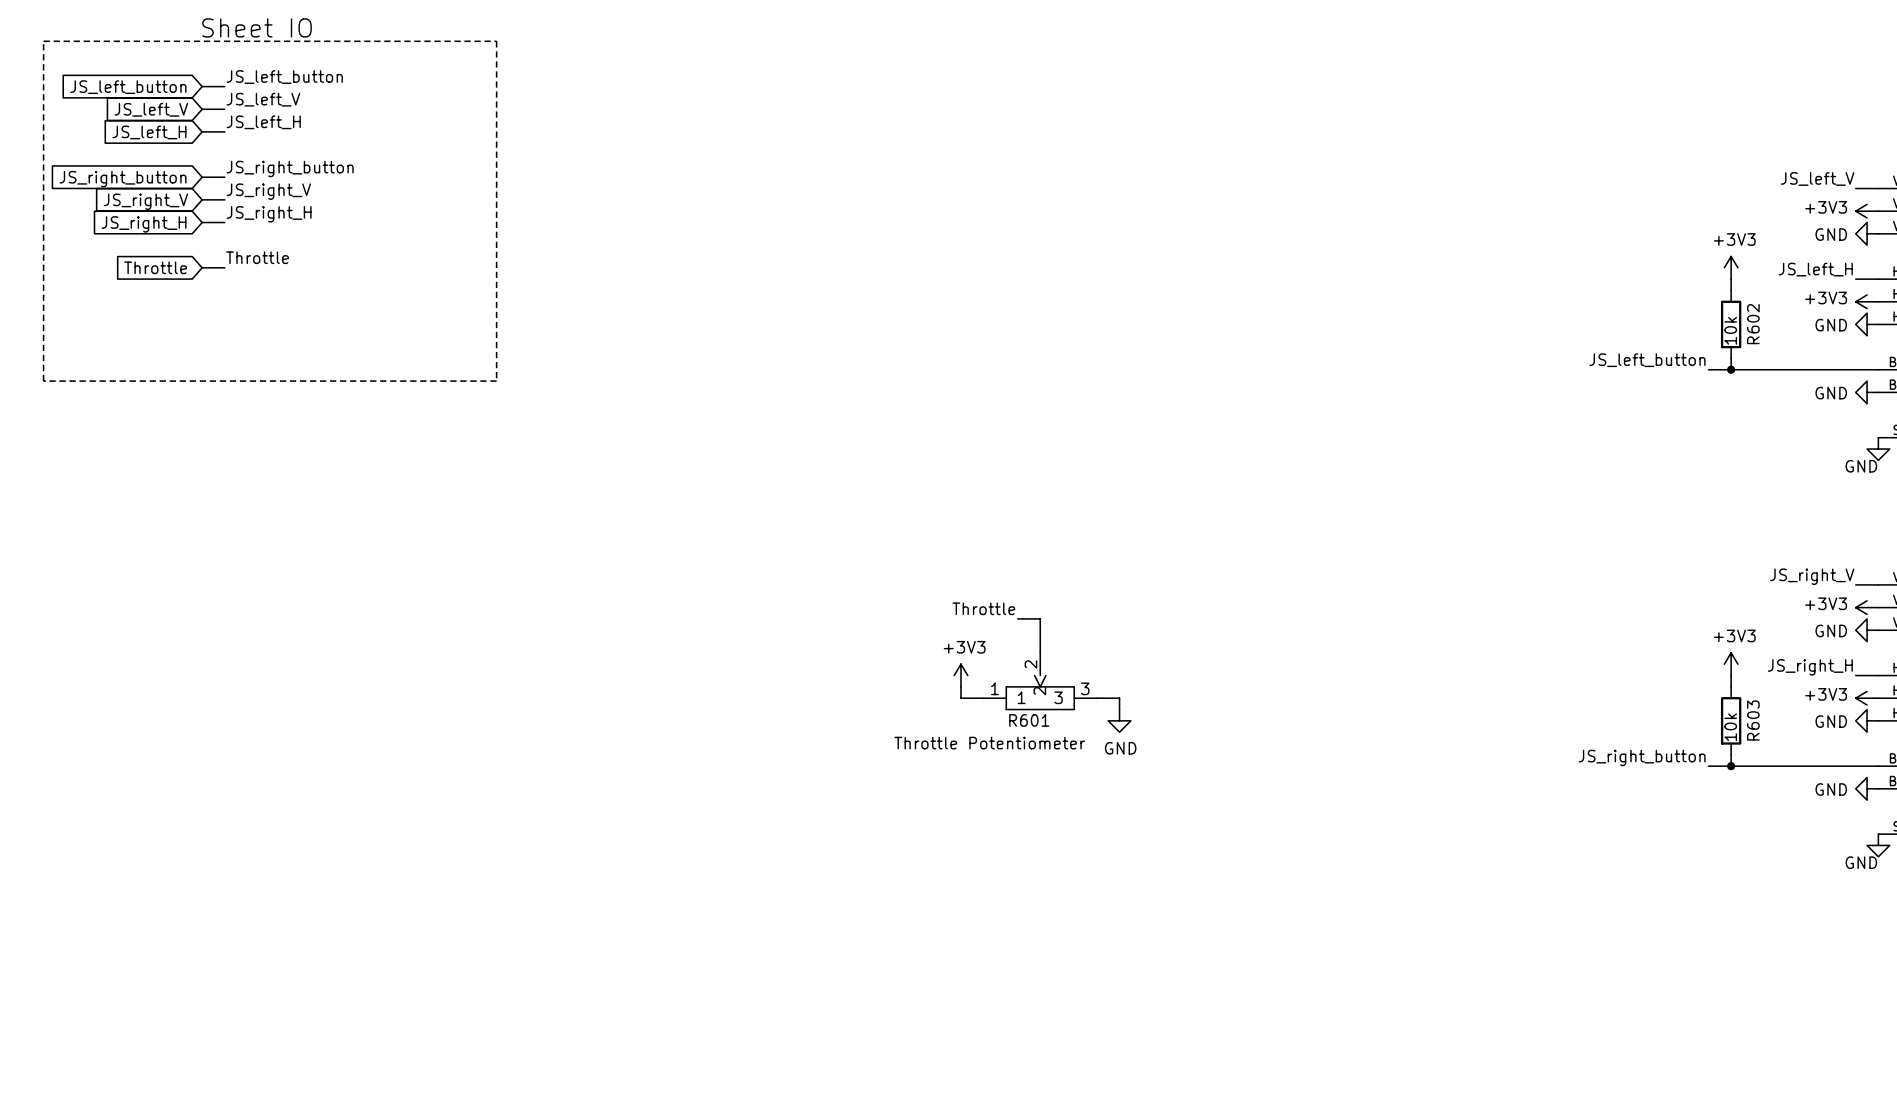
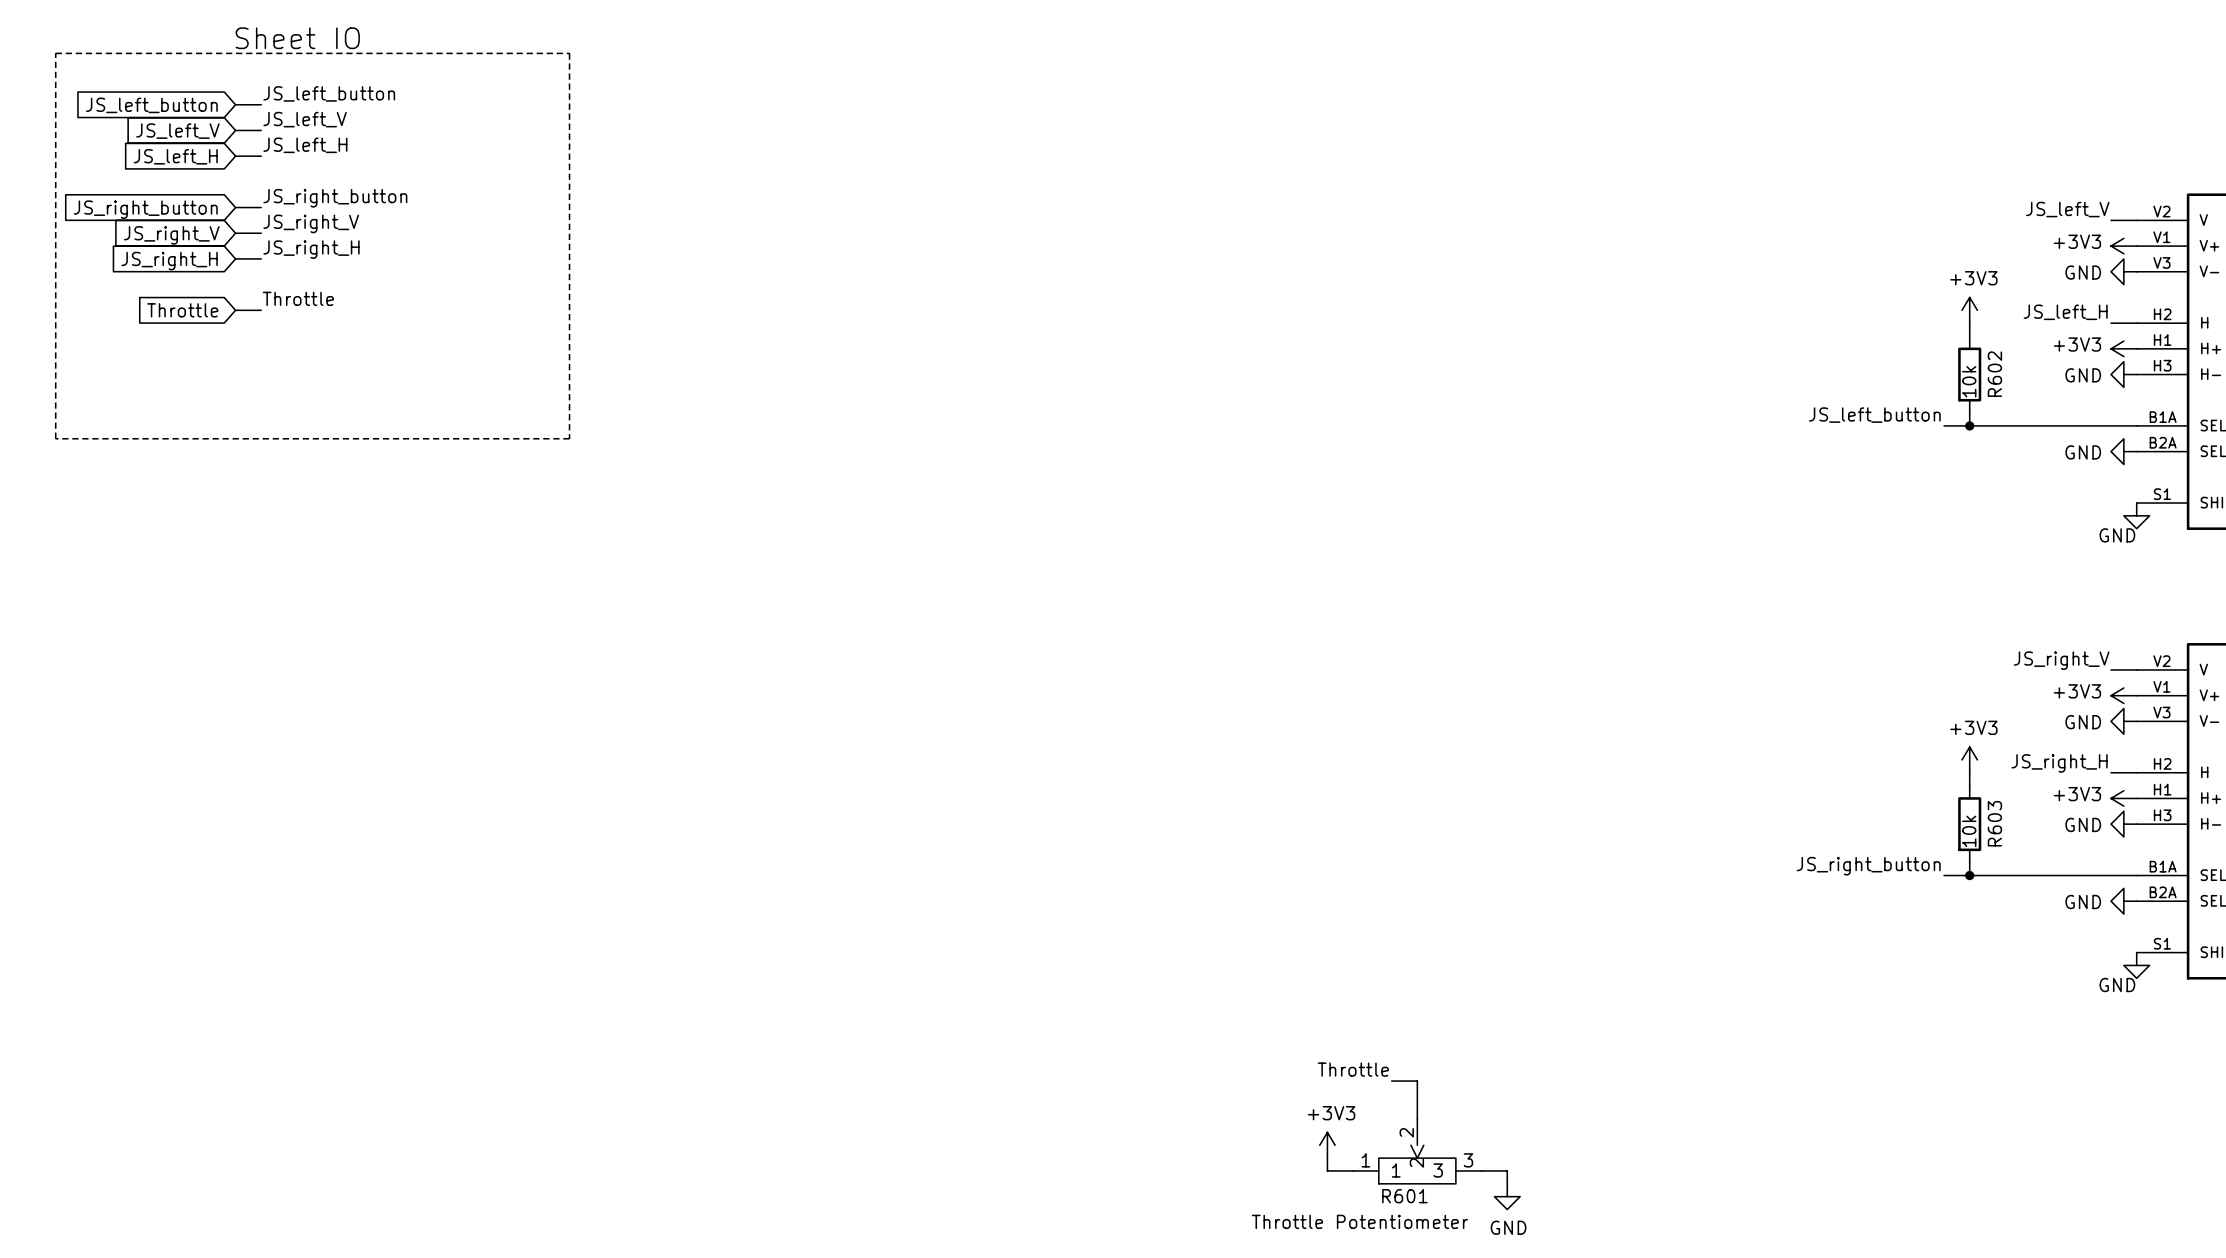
label: Throttle (983, 608) -> none
wire: (1017, 618) (1040, 618) (1040, 652) -> none
power symbol: +3V3 (960, 675) -> none
R601 position: (1040, 681) -> (1417, 1151)
wire: (960, 686) (960, 698) (983, 698) -> none
wire: (1096, 698) (1119, 698) (1119, 709) -> none
power symbol: GND (1119, 720) -> none
label: none -> Throttle (1353, 1069)
wire: none -> (1391, 1081) (1417, 1081) (1417, 1119)
power symbol: none -> +3V3 (1327, 1145)
wire: none -> (1327, 1158) (1327, 1170) (1353, 1170)
wire: none -> (1481, 1170) (1507, 1170) (1507, 1183)
power symbol: none -> GND (1507, 1196)

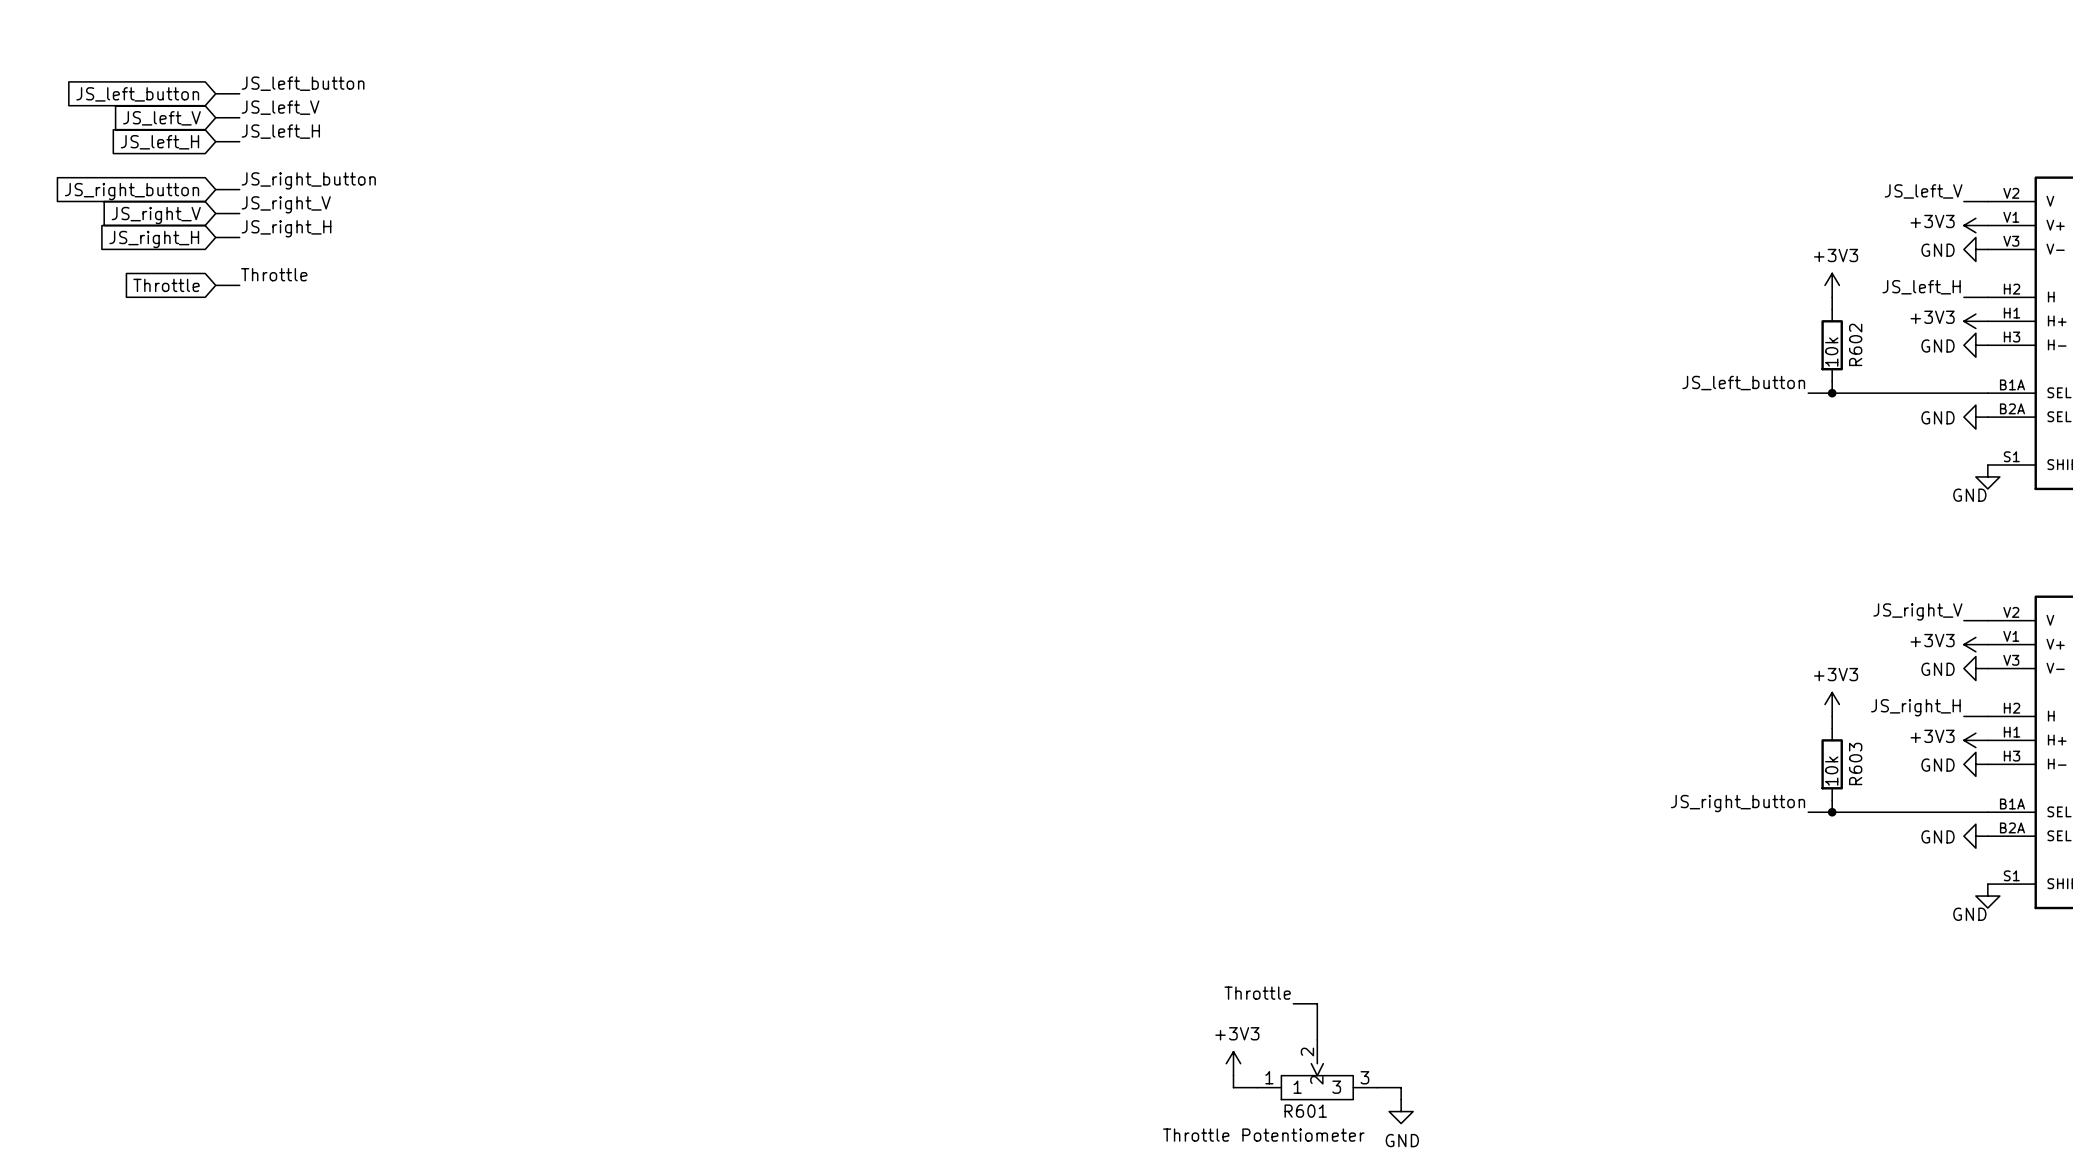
text: Sheet IO (297, 38) -> none
line: (55, 53) (569, 53) (569, 438) (55, 438) (55, 53) -> none

